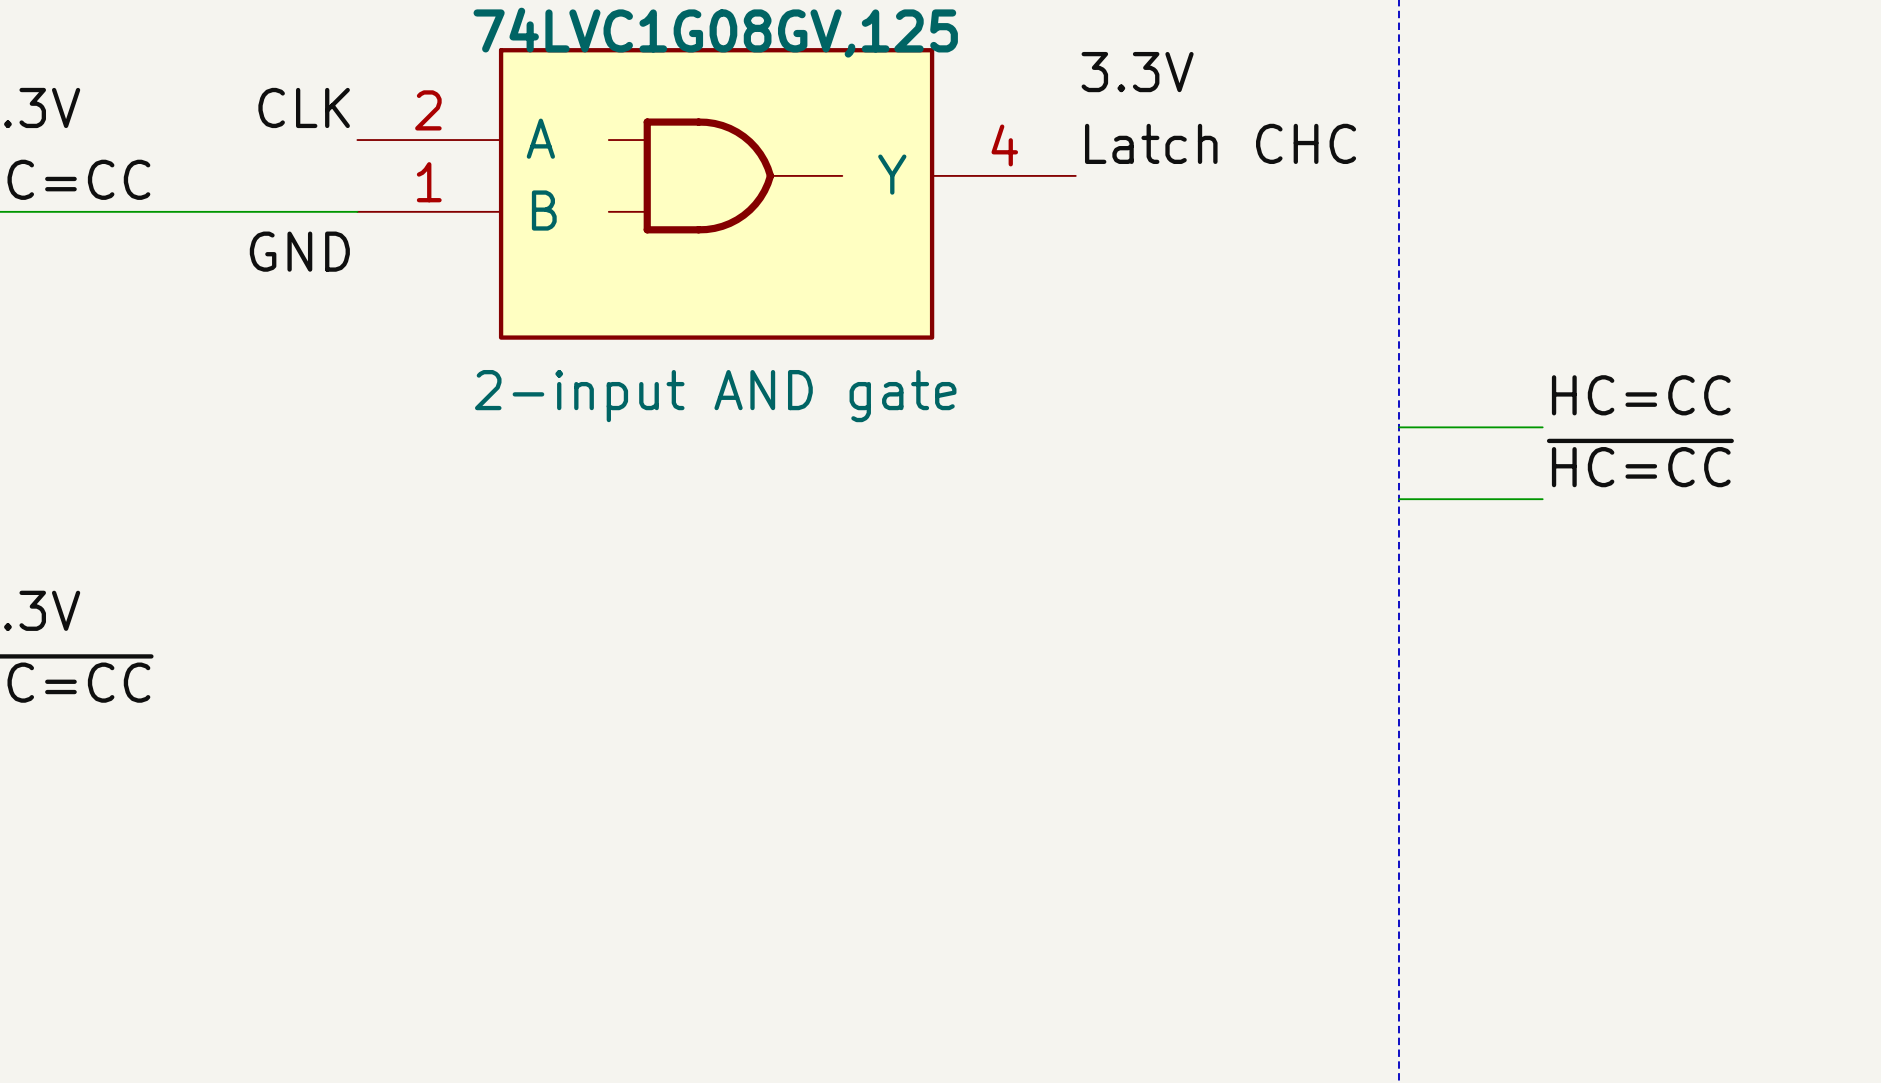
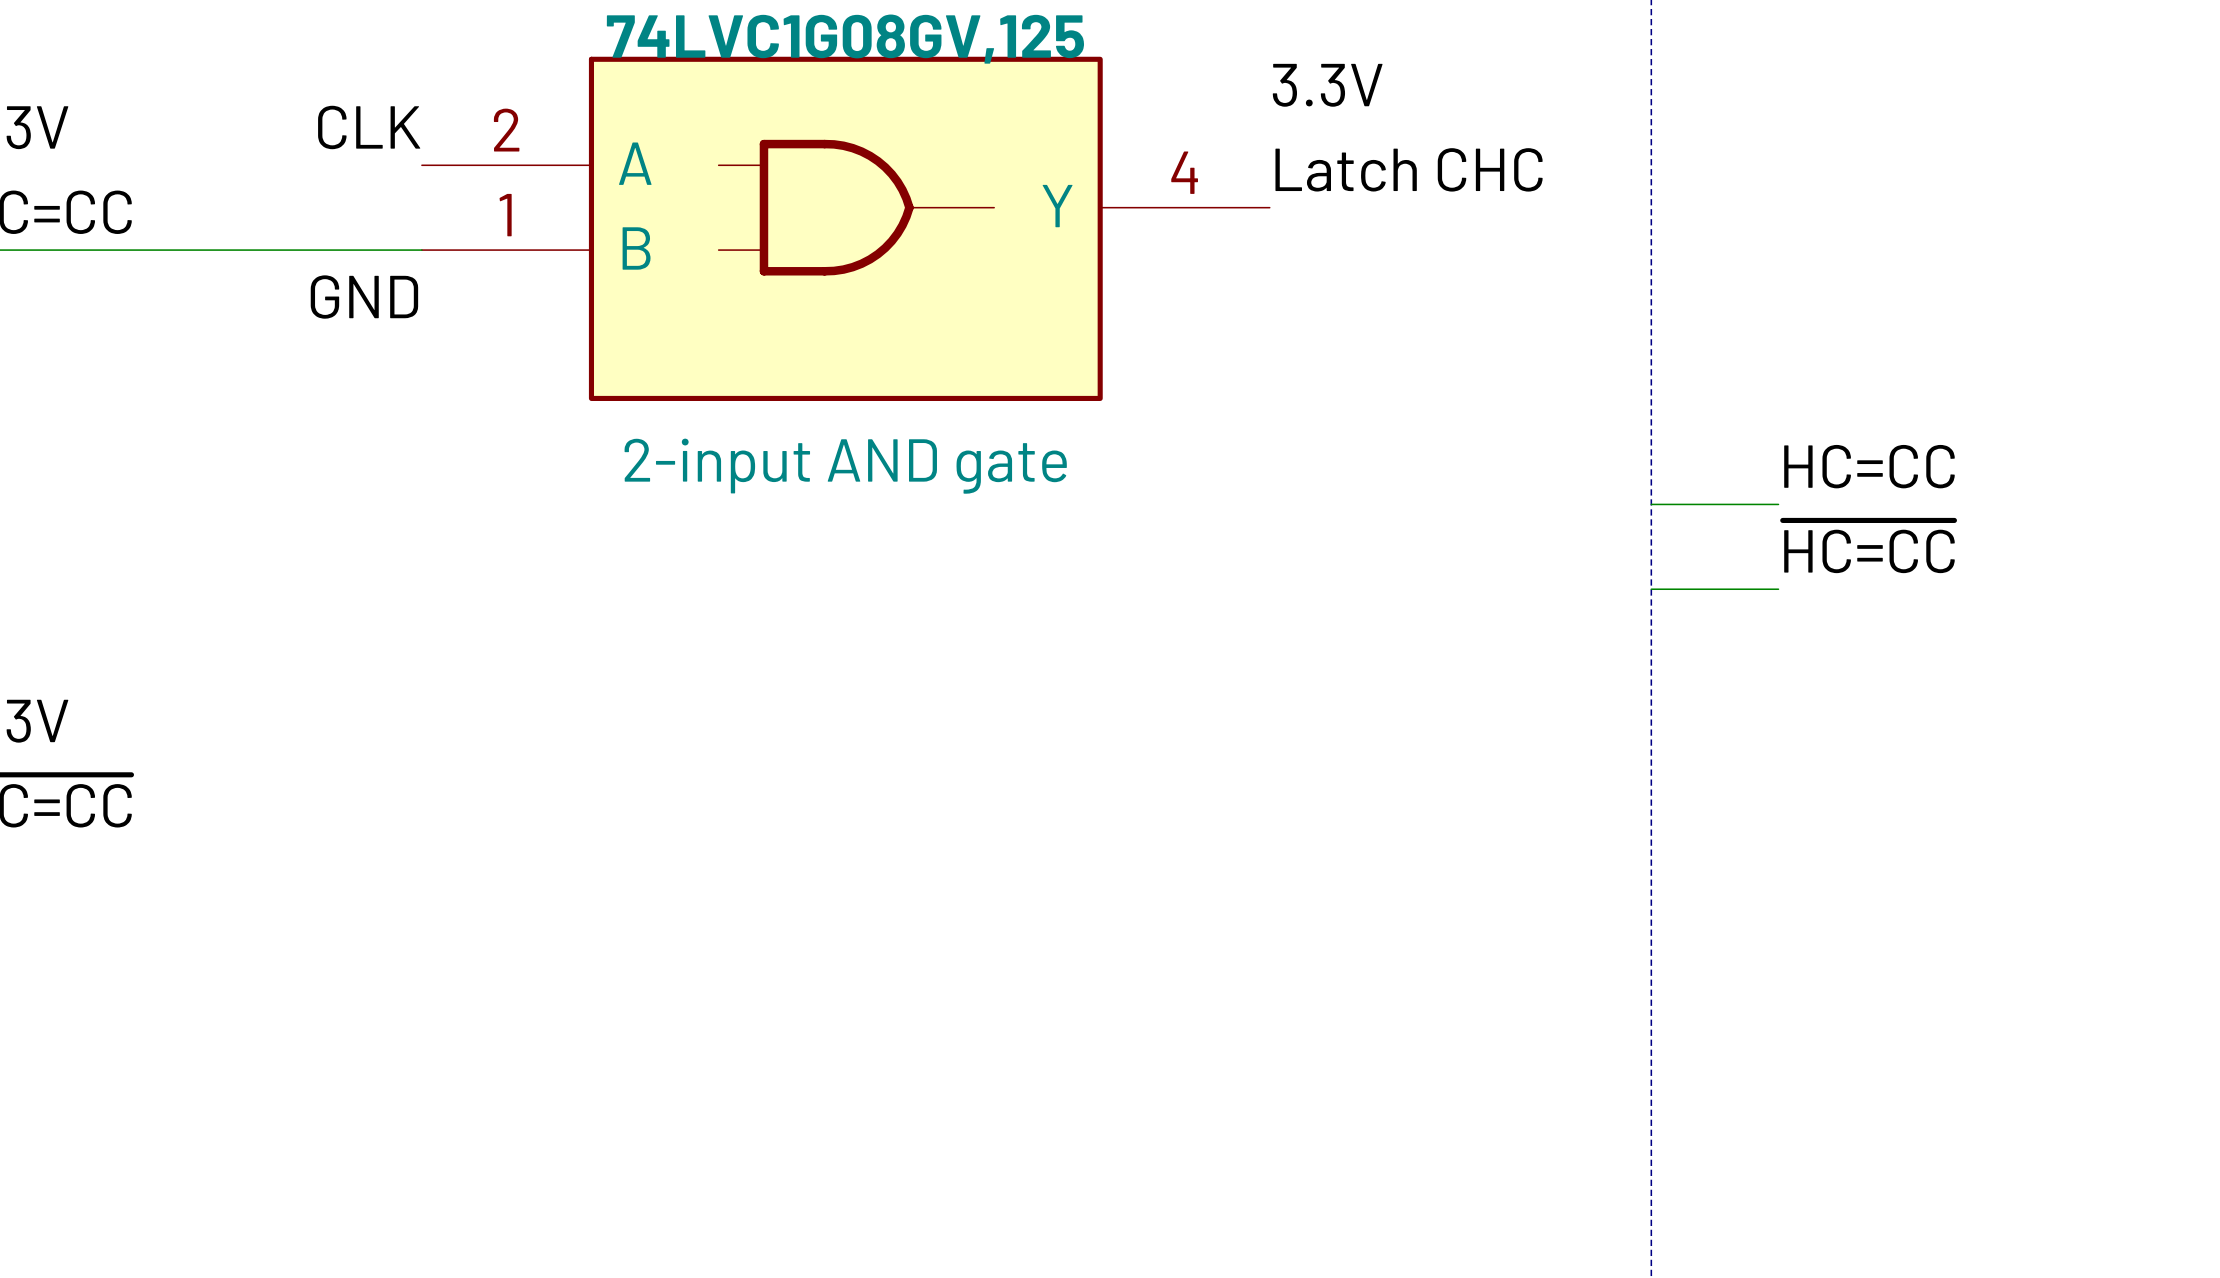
label position: HC=CC (1641, 395) -> HC=CC (1869, 466)
wire: (1506, 427) (1542, 427) -> none
label position: ~{HC=CC} (1640, 463) -> ~{HC=CC} (1868, 546)
wire: (1506, 499) (1542, 499) -> none

